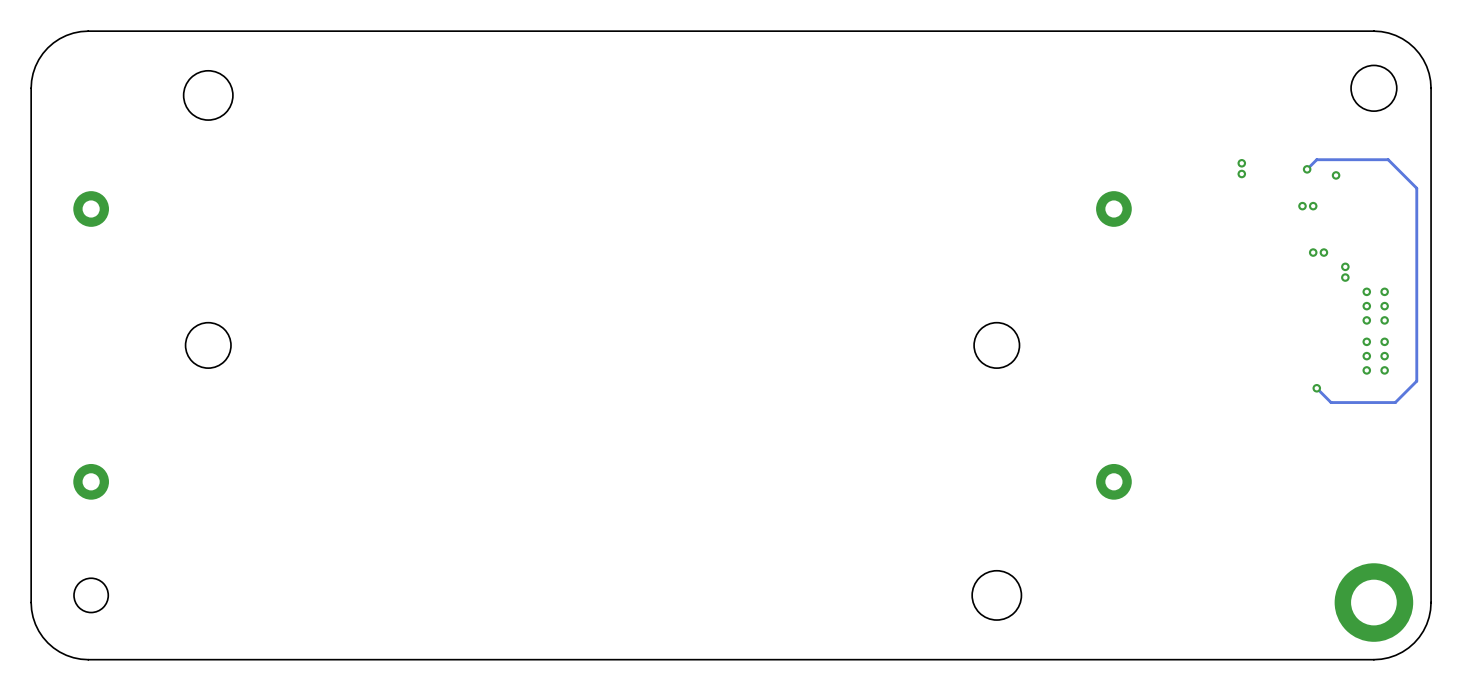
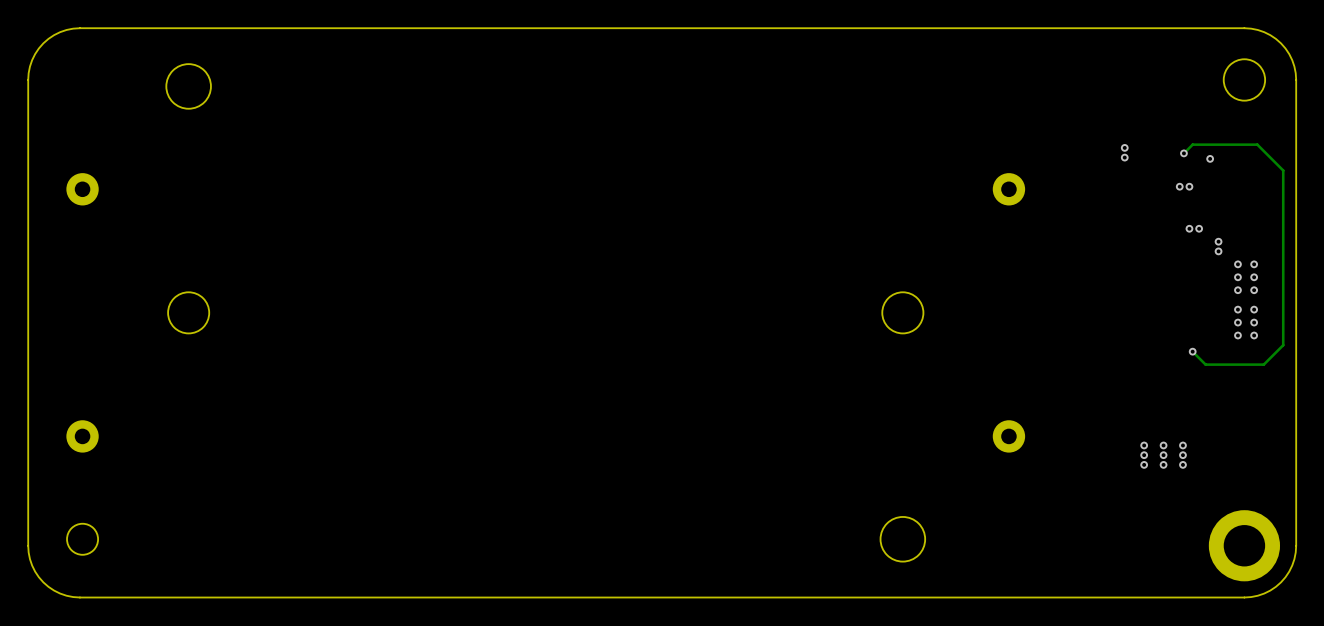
via: none -> (1144, 445)
via: none -> (1163, 445)
via: none -> (1182, 445)
via: none -> (1144, 455)
via: none -> (1163, 455)
via: none -> (1182, 455)
via: none -> (1144, 464)
via: none -> (1163, 464)
via: none -> (1182, 464)

